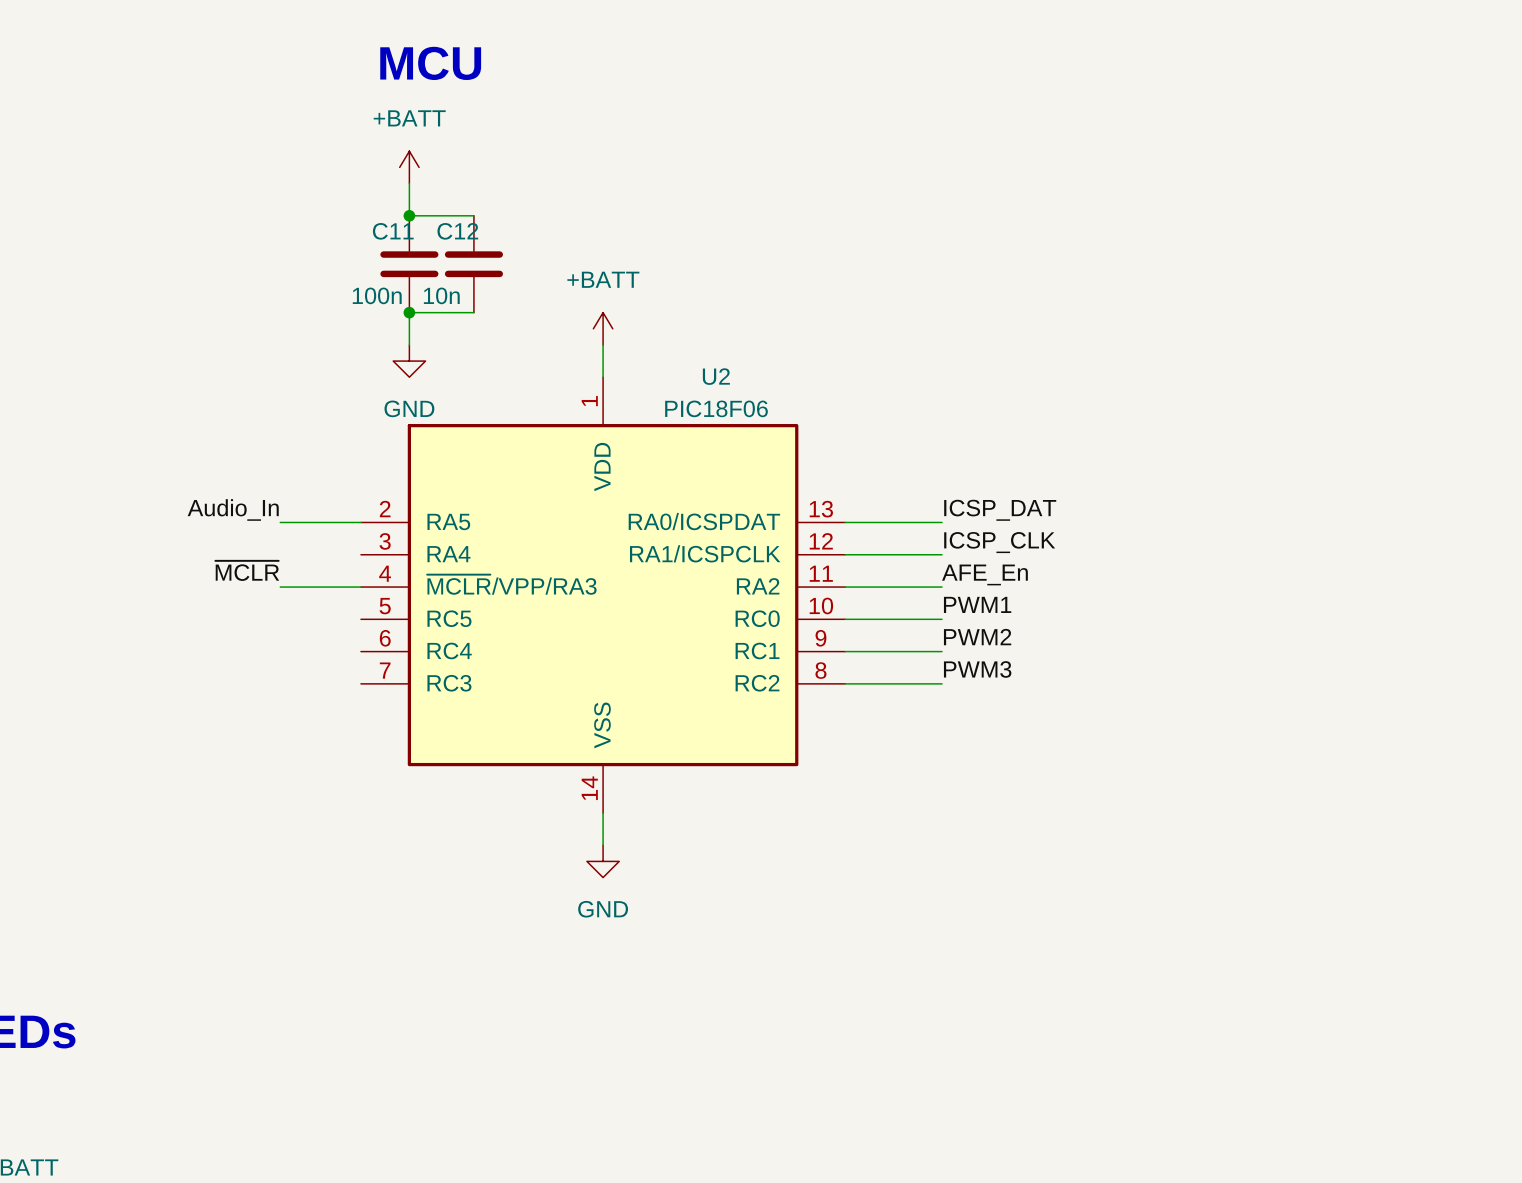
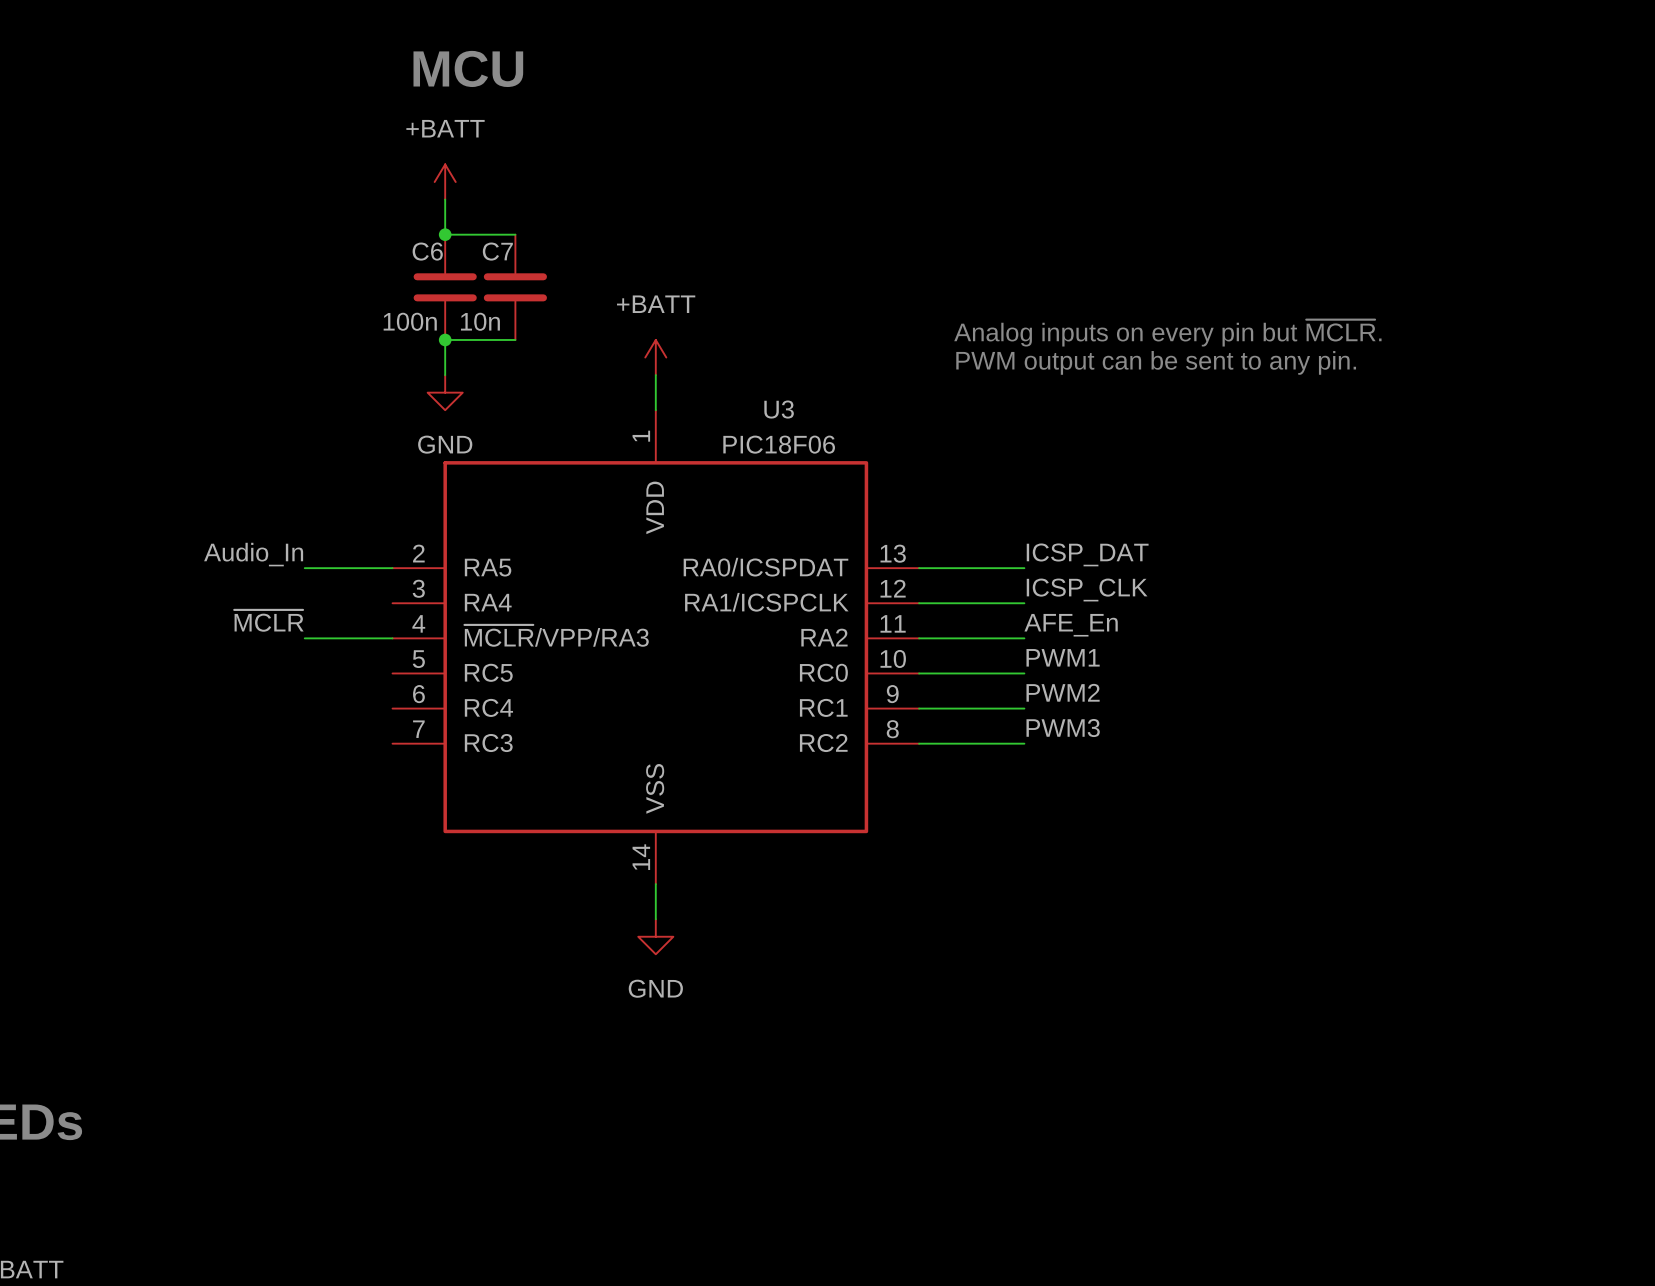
C11 name: C11 (393, 231) -> C6 (427, 251)
C12 name: C12 (457, 231) -> C7 (497, 251)
text: none -> Analog inputs on every pin but ~{MCLR}. (1167, 333)
text: none -> PWM output can be sent to any pin. (1156, 362)
U2 name: U2 (716, 376) -> U3 (779, 409)

